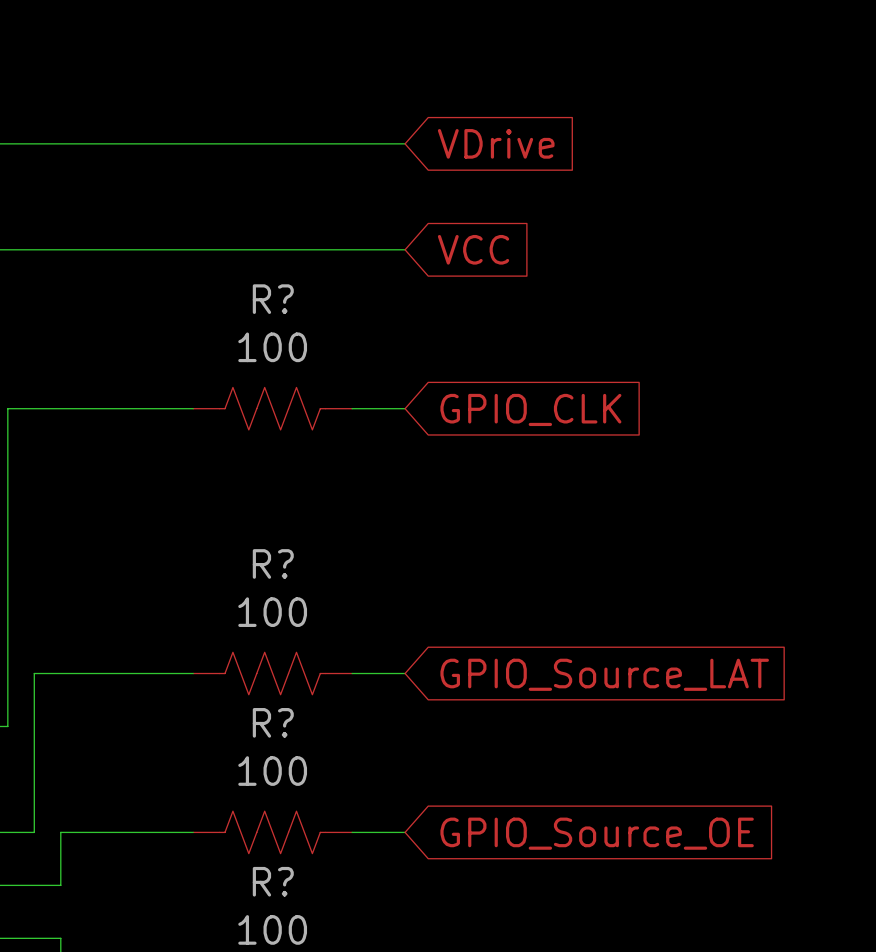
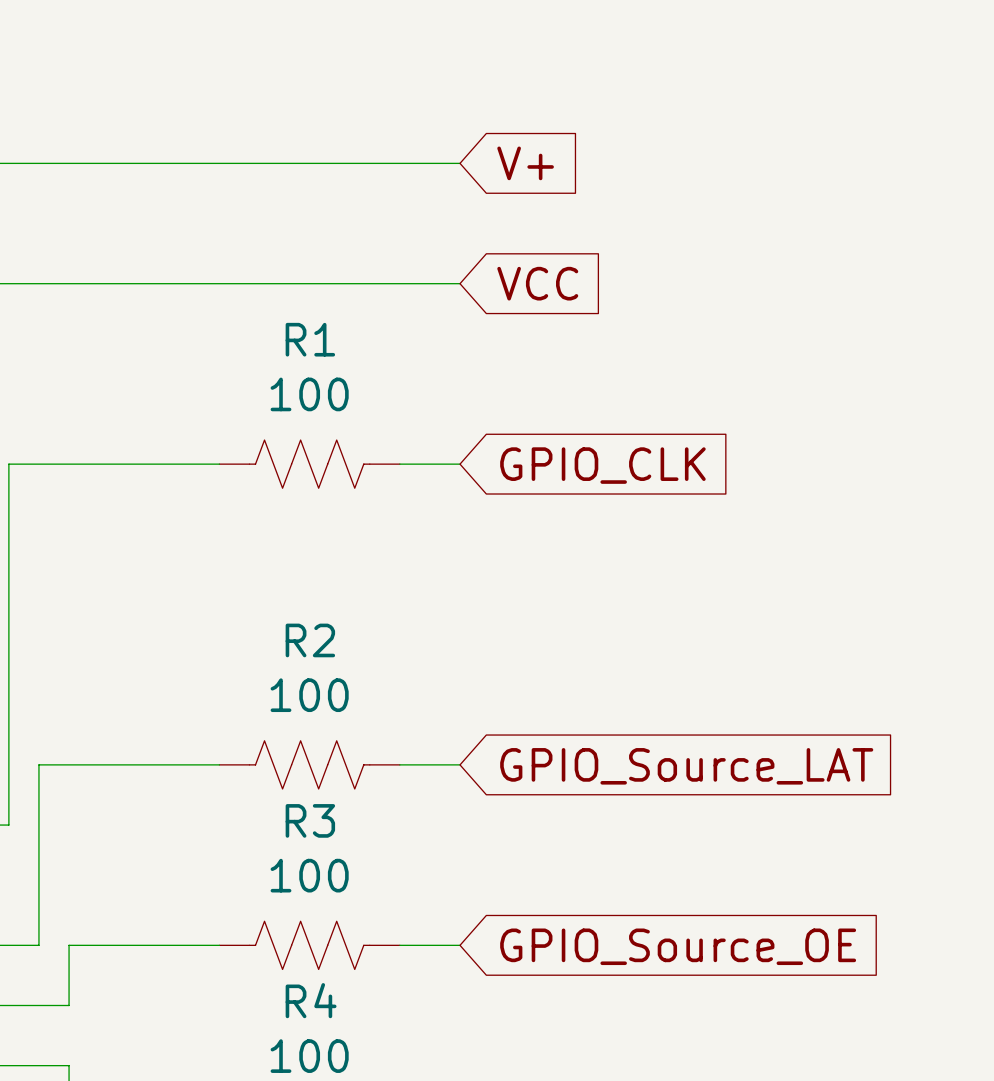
global label: VDrive (496, 143) -> V+ (525, 163)
R? name: R? (273, 299) -> R1 (310, 339)
R? name: R? (273, 563) -> R2 (310, 640)
R? name: R? (273, 722) -> R3 (310, 820)
R? name: R? (273, 881) -> R4 (311, 1000)

